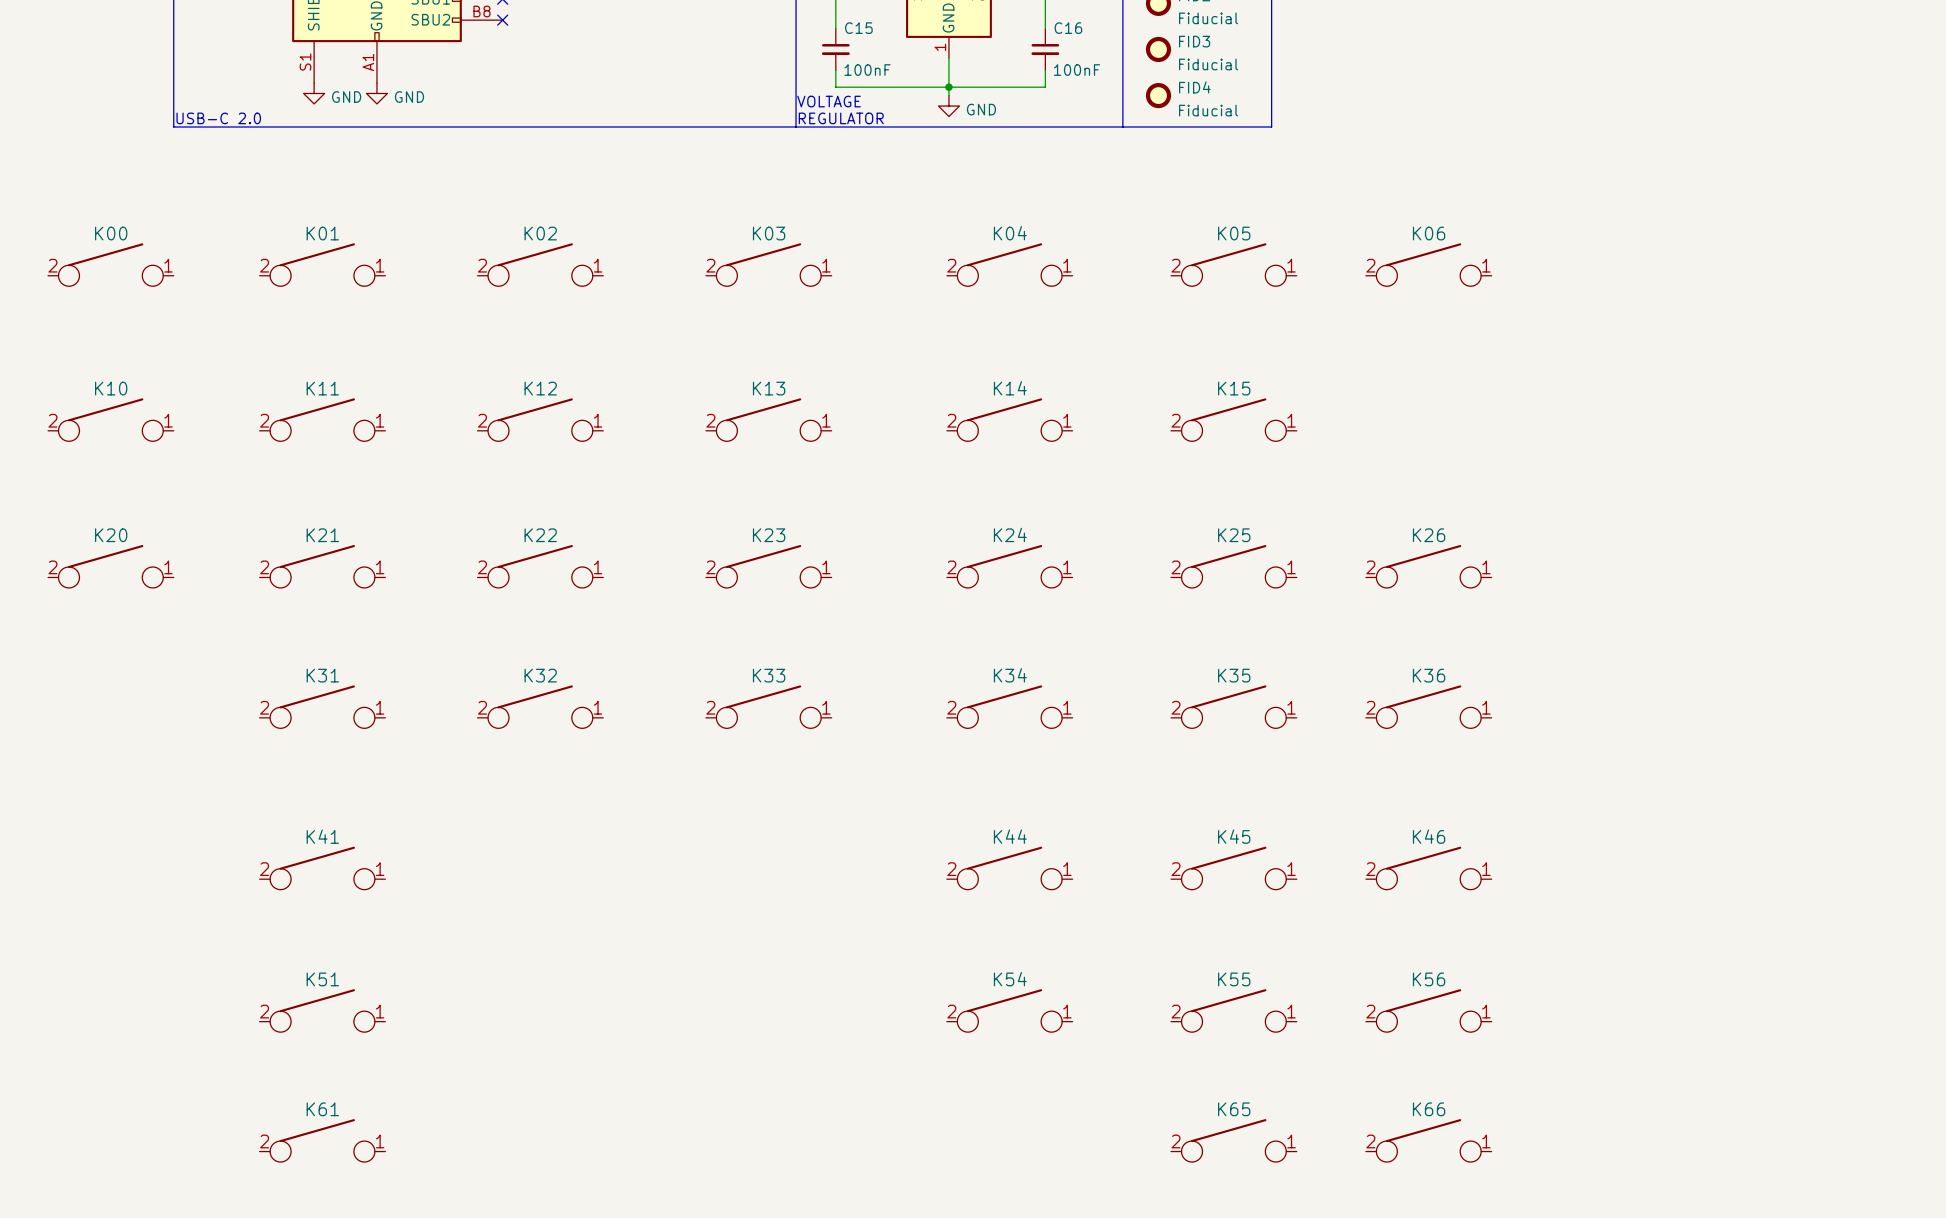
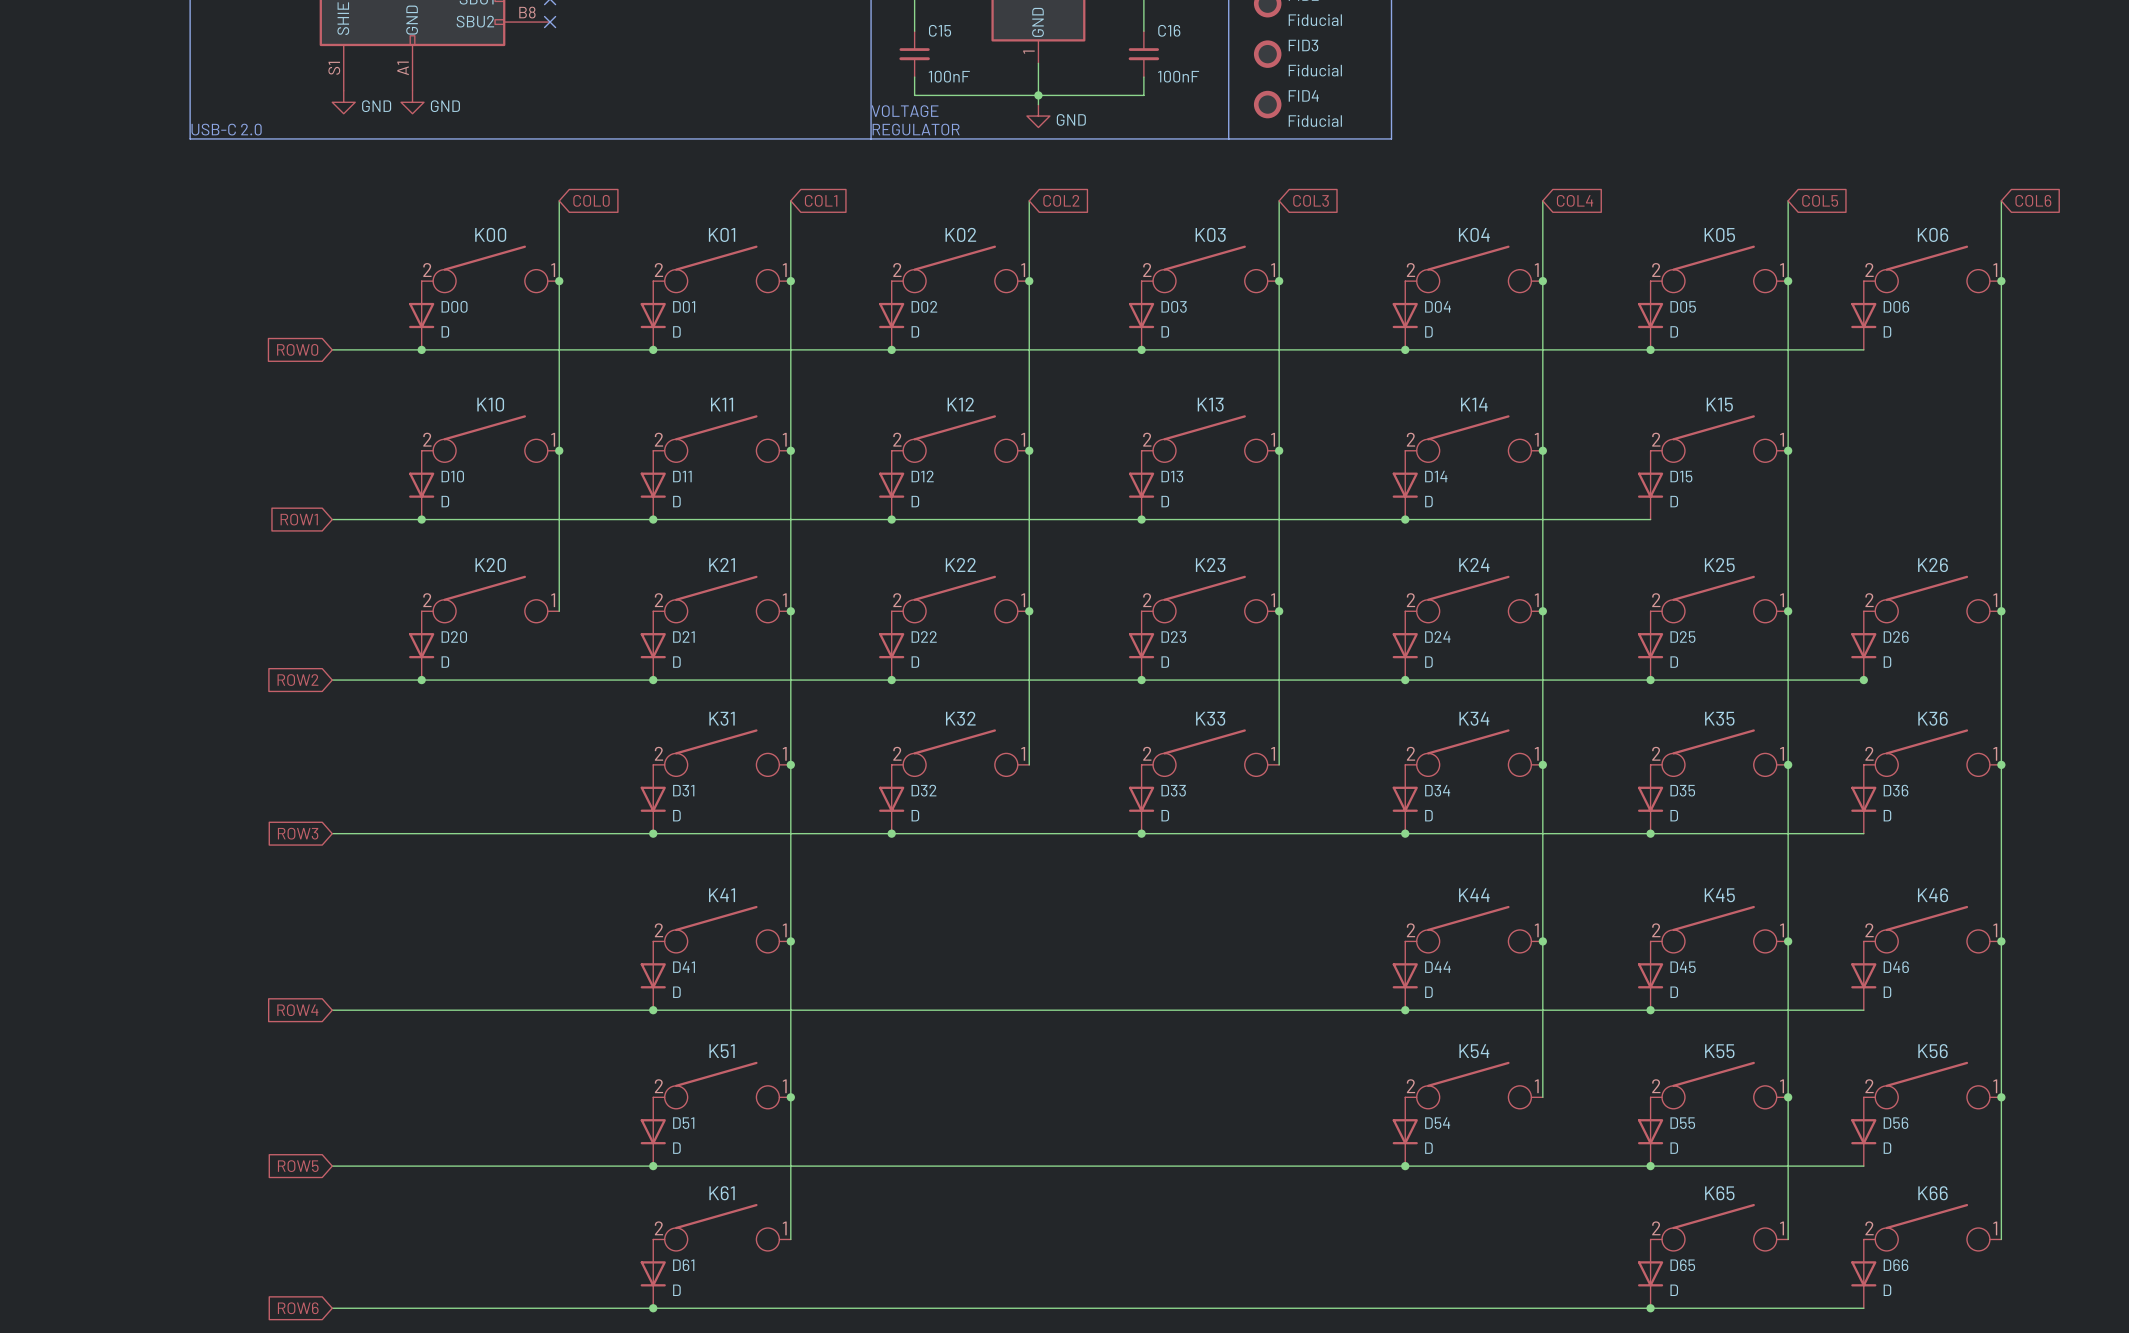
wire: none -> (559, 200) (559, 611)
global label: none -> COL0 (591, 200)
wire: none -> (790, 200) (790, 1239)
global label: none -> COL1 (821, 200)
wire: none -> (1029, 200) (1029, 764)
global label: none -> COL2 (1061, 200)
wire: none -> (1279, 200) (1279, 764)
global label: none -> COL3 (1311, 200)
wire: none -> (1542, 200) (1542, 1097)
global label: none -> COL4 (1575, 200)
wire: none -> (1788, 200) (1788, 1239)
global label: none -> COL5 (1820, 200)
wire: none -> (2001, 200) (2001, 1239)
global label: none -> COL6 (2033, 200)
junction: none -> (559, 281)
junction: none -> (790, 281)
junction: none -> (1029, 281)
junction: none -> (1279, 281)
junction: none -> (1542, 281)
junction: none -> (1788, 281)
junction: none -> (2001, 281)
K00 position: (110, 264) -> (490, 269)
K01 position: (322, 264) -> (722, 269)
K02 position: (540, 264) -> (960, 269)
K03 position: (768, 264) -> (1210, 269)
K04 position: (1009, 264) -> (1474, 269)
K05 position: (1233, 264) -> (1719, 269)
K06 position: (1428, 264) -> (1932, 269)
D00: none -> D (421, 315)
D01: none -> D (653, 315)
D02: none -> D (891, 315)
D03: none -> D (1141, 315)
D04: none -> D (1405, 315)
D05: none -> D (1650, 315)
D06: none -> D (1863, 315)
global label: none -> ROW0 (297, 349)
wire: none -> (332, 349) (1863, 349)
junction: none -> (421, 349)
junction: none -> (653, 349)
junction: none -> (891, 349)
junction: none -> (1141, 349)
junction: none -> (1405, 349)
junction: none -> (1650, 349)
junction: none -> (559, 450)
junction: none -> (790, 450)
junction: none -> (1029, 450)
junction: none -> (1279, 450)
junction: none -> (1542, 450)
junction: none -> (1788, 450)
K10 position: (110, 419) -> (490, 438)
K11 position: (322, 419) -> (722, 438)
K12 position: (540, 419) -> (960, 438)
K13 position: (768, 419) -> (1210, 438)
K14 position: (1009, 419) -> (1474, 438)
K15 position: (1233, 419) -> (1719, 438)
D10: none -> D (421, 485)
D11: none -> D (653, 485)
D12: none -> D (891, 485)
D13: none -> D (1141, 485)
D14: none -> D (1405, 485)
D15: none -> D (1650, 485)
global label: none -> ROW1 (299, 519)
wire: none -> (332, 519) (1650, 519)
junction: none -> (421, 519)
junction: none -> (653, 519)
junction: none -> (891, 519)
junction: none -> (1141, 519)
junction: none -> (1405, 519)
junction: none -> (790, 611)
junction: none -> (1029, 611)
junction: none -> (1279, 611)
junction: none -> (1542, 611)
junction: none -> (1788, 611)
junction: none -> (2001, 611)
K20 position: (110, 566) -> (490, 599)
K21 position: (322, 566) -> (722, 599)
K22 position: (540, 566) -> (960, 599)
K23 position: (768, 566) -> (1210, 599)
K24 position: (1009, 566) -> (1474, 599)
K25 position: (1233, 566) -> (1719, 599)
K26 position: (1428, 566) -> (1932, 599)
D20: none -> D (421, 645)
D21: none -> D (653, 645)
D22: none -> D (891, 645)
D23: none -> D (1141, 645)
D24: none -> D (1405, 645)
D25: none -> D (1650, 645)
D26: none -> D (1863, 645)
global label: none -> ROW2 (297, 680)
wire: none -> (332, 680) (1866, 680)
junction: none -> (421, 680)
junction: none -> (653, 680)
junction: none -> (891, 680)
junction: none -> (1141, 680)
junction: none -> (1405, 680)
junction: none -> (1650, 680)
junction: none -> (1863, 680)
junction: none -> (790, 764)
junction: none -> (1542, 764)
junction: none -> (1788, 764)
junction: none -> (2001, 764)
K31 position: (322, 706) -> (722, 752)
K32 position: (540, 706) -> (960, 752)
K33 position: (768, 706) -> (1210, 752)
K34 position: (1009, 706) -> (1474, 752)
K35 position: (1233, 706) -> (1719, 752)
K36 position: (1428, 706) -> (1932, 752)
D31: none -> D (653, 799)
D32: none -> D (891, 799)
D33: none -> D (1141, 799)
D34: none -> D (1405, 799)
D35: none -> D (1650, 799)
D36: none -> D (1863, 799)
global label: none -> ROW3 (298, 833)
wire: none -> (332, 833) (1863, 833)
junction: none -> (653, 833)
junction: none -> (891, 833)
junction: none -> (1141, 833)
junction: none -> (1405, 833)
junction: none -> (1650, 833)
junction: none -> (790, 941)
junction: none -> (1542, 941)
junction: none -> (1788, 941)
junction: none -> (2001, 941)
K41 position: (322, 868) -> (722, 929)
K44 position: (1009, 868) -> (1474, 929)
K45 position: (1233, 868) -> (1719, 929)
K46 position: (1428, 868) -> (1932, 929)
D41: none -> D (653, 975)
D44: none -> D (1405, 975)
D45: none -> D (1650, 975)
D46: none -> D (1863, 975)
global label: none -> ROW4 (297, 1010)
wire: none -> (332, 1010) (1863, 1010)
junction: none -> (653, 1010)
junction: none -> (1405, 1010)
junction: none -> (1650, 1010)
junction: none -> (790, 1097)
junction: none -> (1788, 1097)
junction: none -> (2001, 1097)
K51 position: (322, 1010) -> (722, 1085)
K54 position: (1009, 1010) -> (1474, 1085)
K55 position: (1233, 1010) -> (1719, 1085)
K56 position: (1428, 1010) -> (1932, 1085)
D51: none -> D (653, 1131)
D54: none -> D (1405, 1131)
D55: none -> D (1650, 1131)
D56: none -> D (1863, 1131)
global label: none -> ROW5 (298, 1166)
wire: none -> (332, 1166) (1863, 1166)
junction: none -> (653, 1166)
junction: none -> (1405, 1166)
junction: none -> (1650, 1166)
K61 position: (322, 1140) -> (722, 1227)
K65 position: (1233, 1140) -> (1719, 1227)
K66 position: (1428, 1140) -> (1932, 1227)
D61: none -> D (653, 1273)
D65: none -> D (1650, 1273)
D66: none -> D (1863, 1273)
global label: none -> ROW6 (298, 1308)
wire: none -> (332, 1308) (1863, 1308)
junction: none -> (653, 1308)
junction: none -> (1650, 1308)

